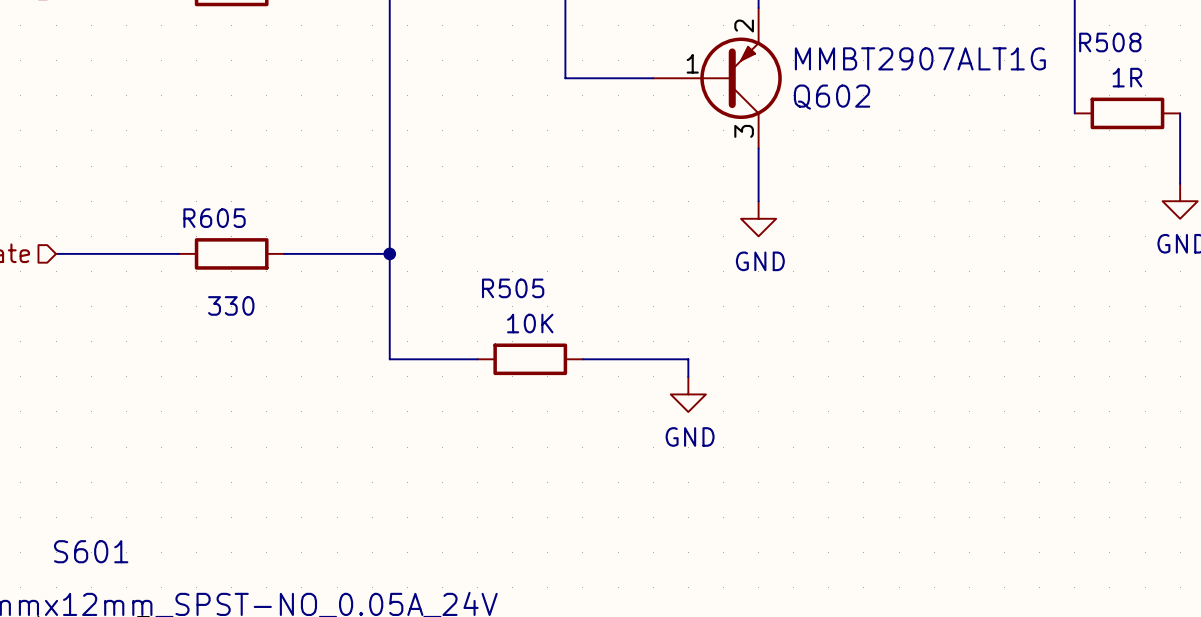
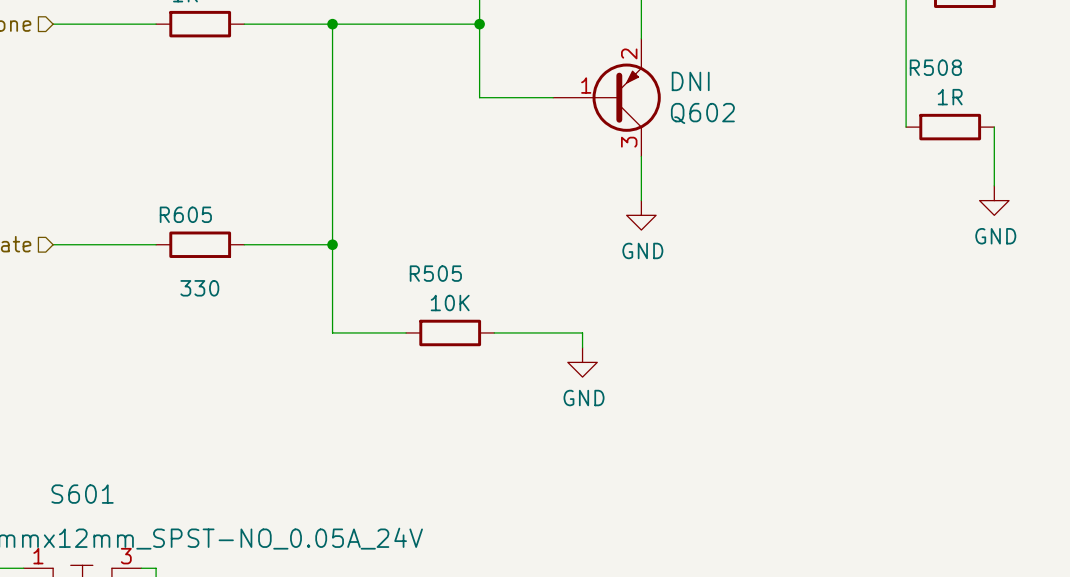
Q602 value: MMBT2907ALT1G (920, 58) -> DNI (690, 81)

